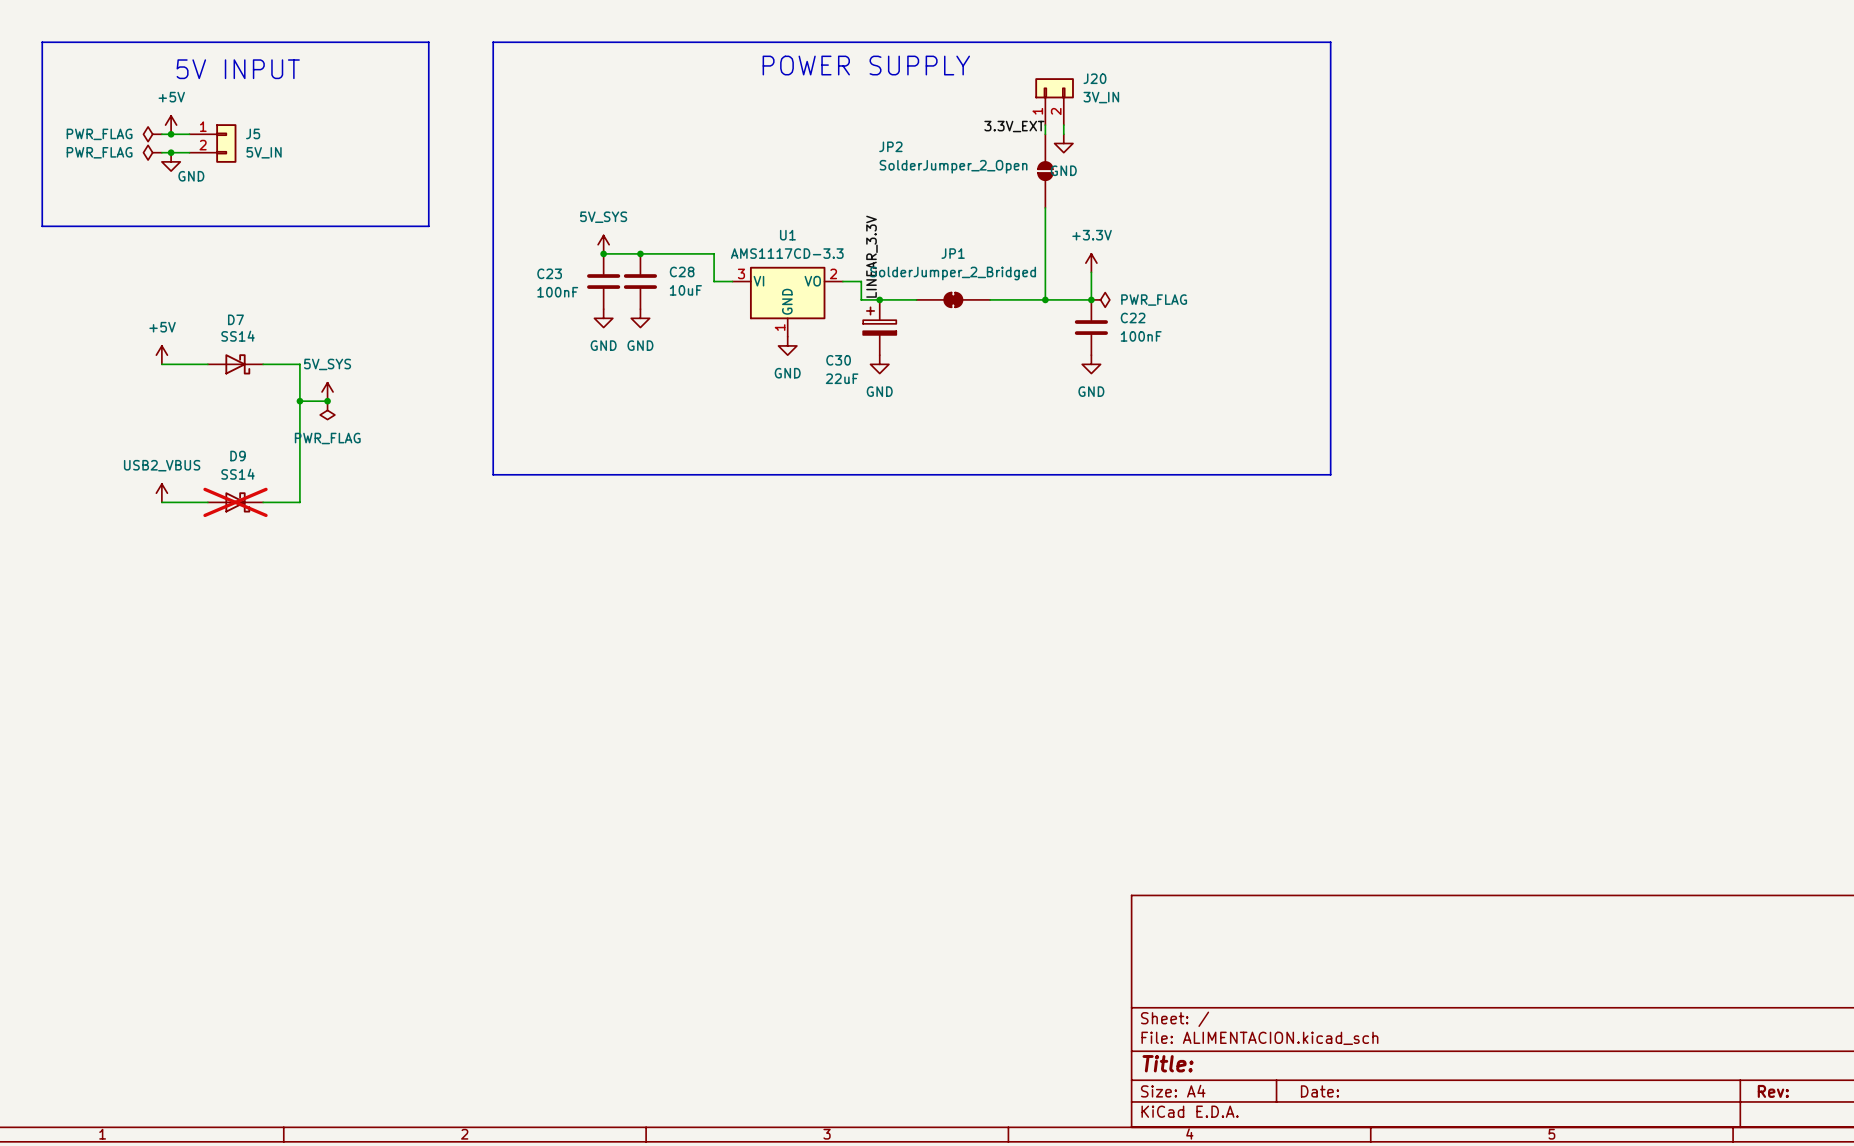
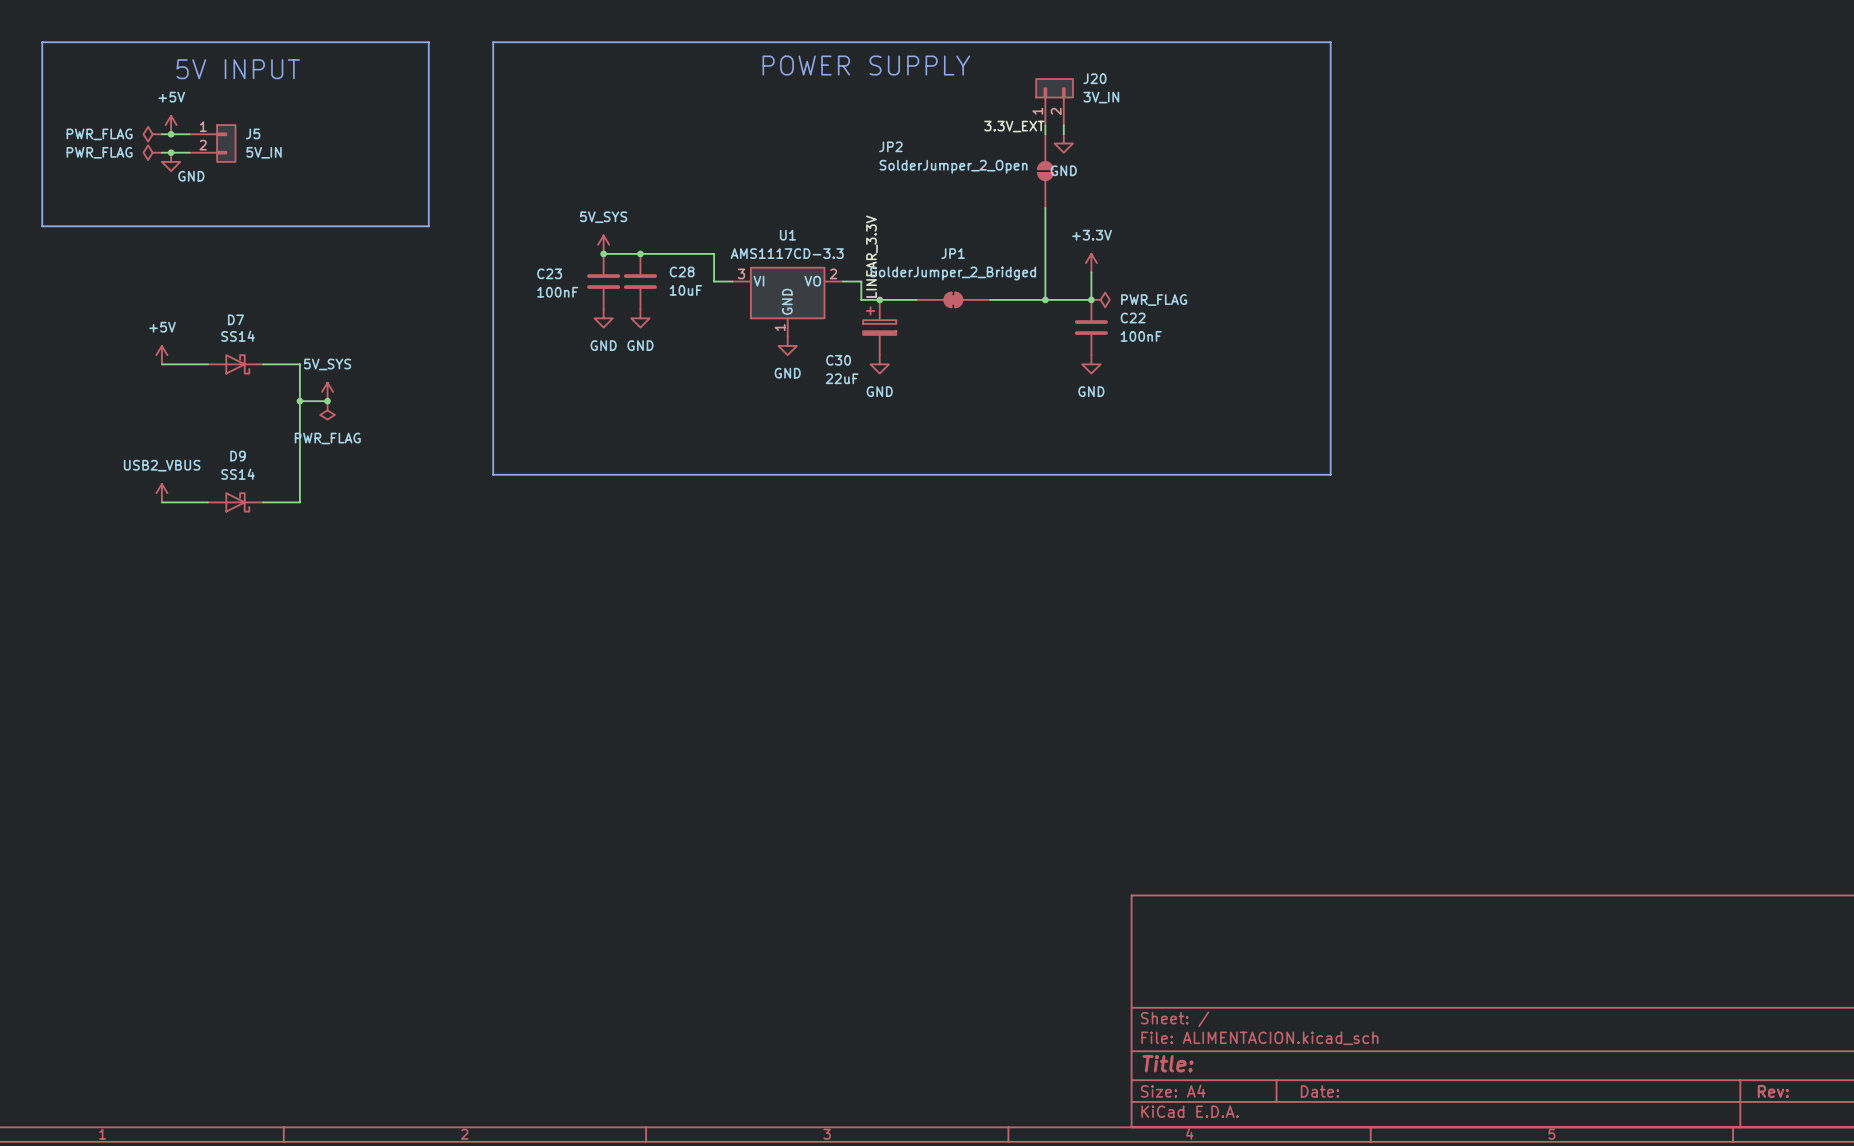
D9 do-not-place cross: (235, 502) -> none

